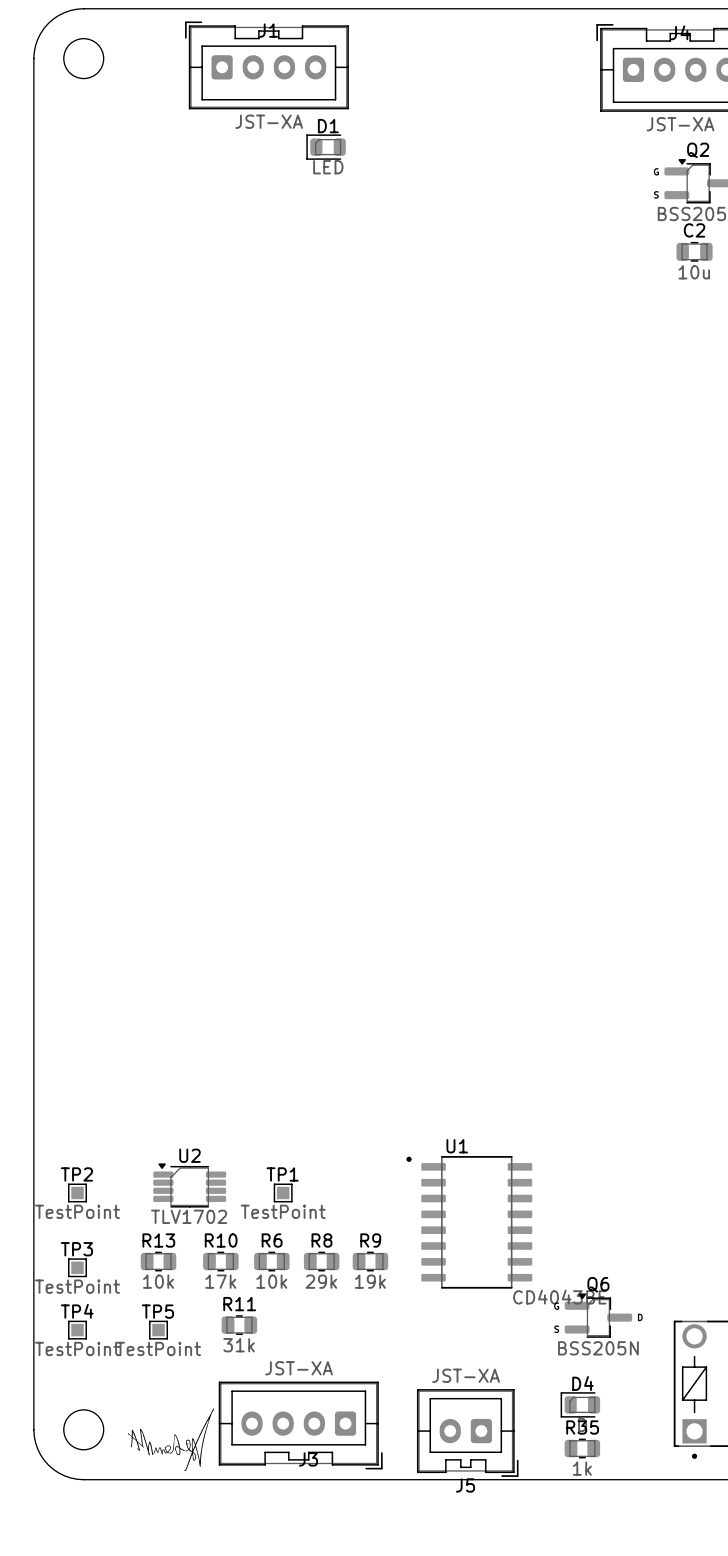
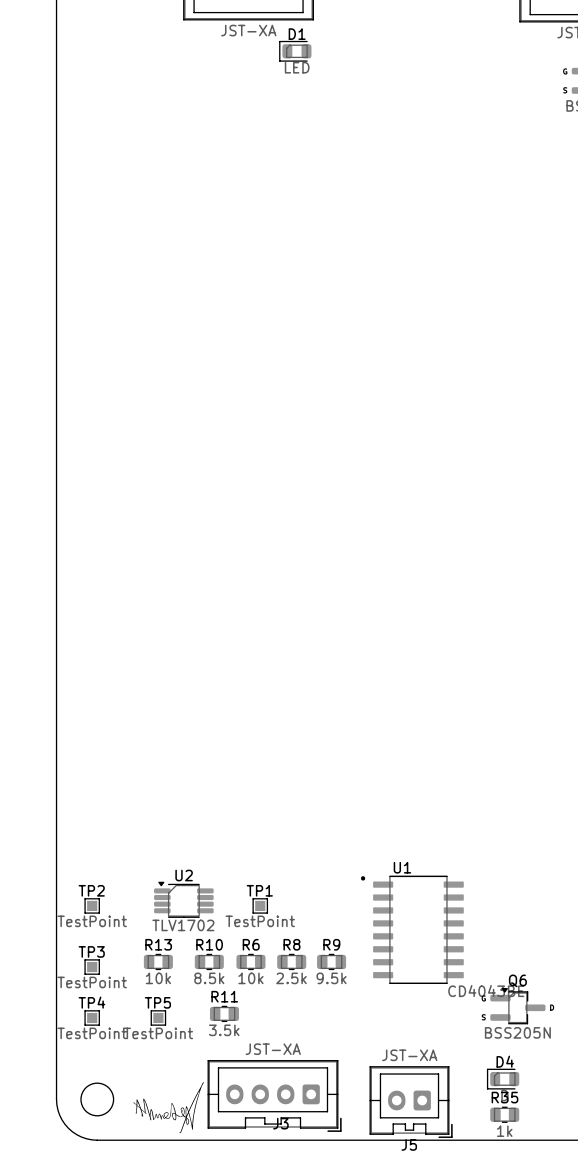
R10 value: 17k (220, 1281) -> 8.5k (209, 978)
R8 value: 29k (321, 1281) -> 2.5k (291, 978)
R9 value: 19k (370, 1281) -> 9.5k (331, 978)
R11 value: 31k (239, 1345) -> 3.5k (224, 1030)

